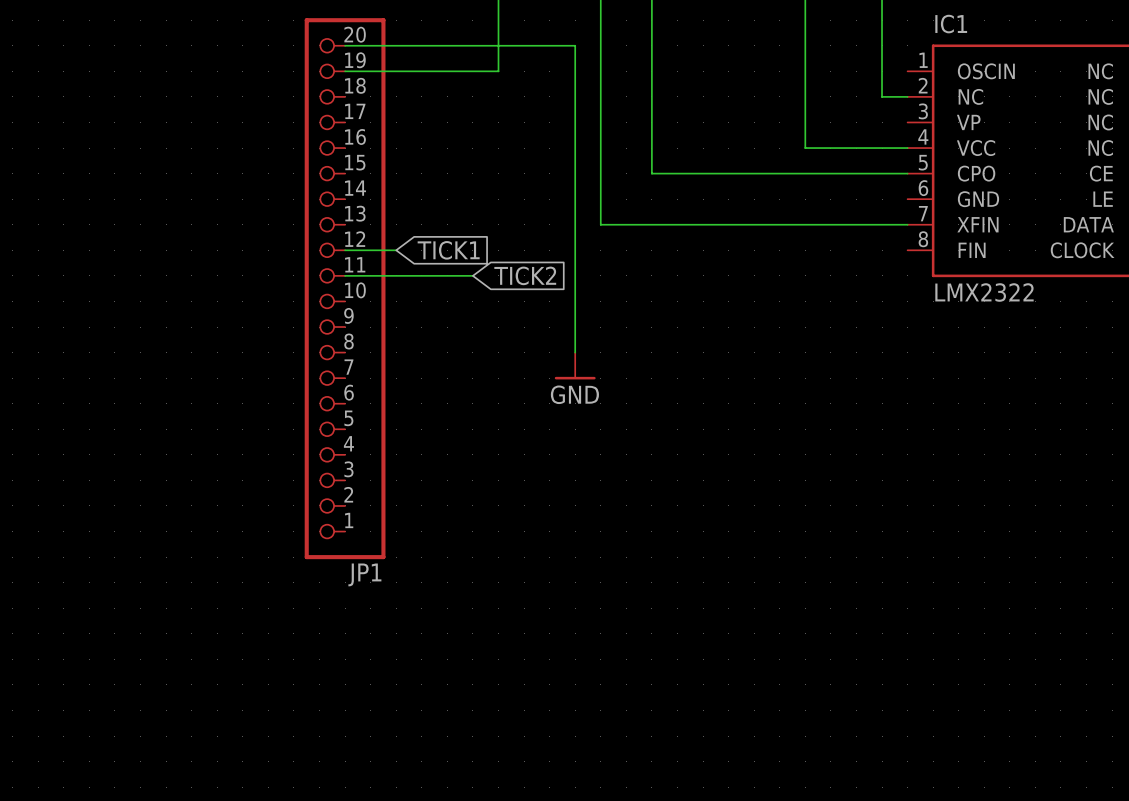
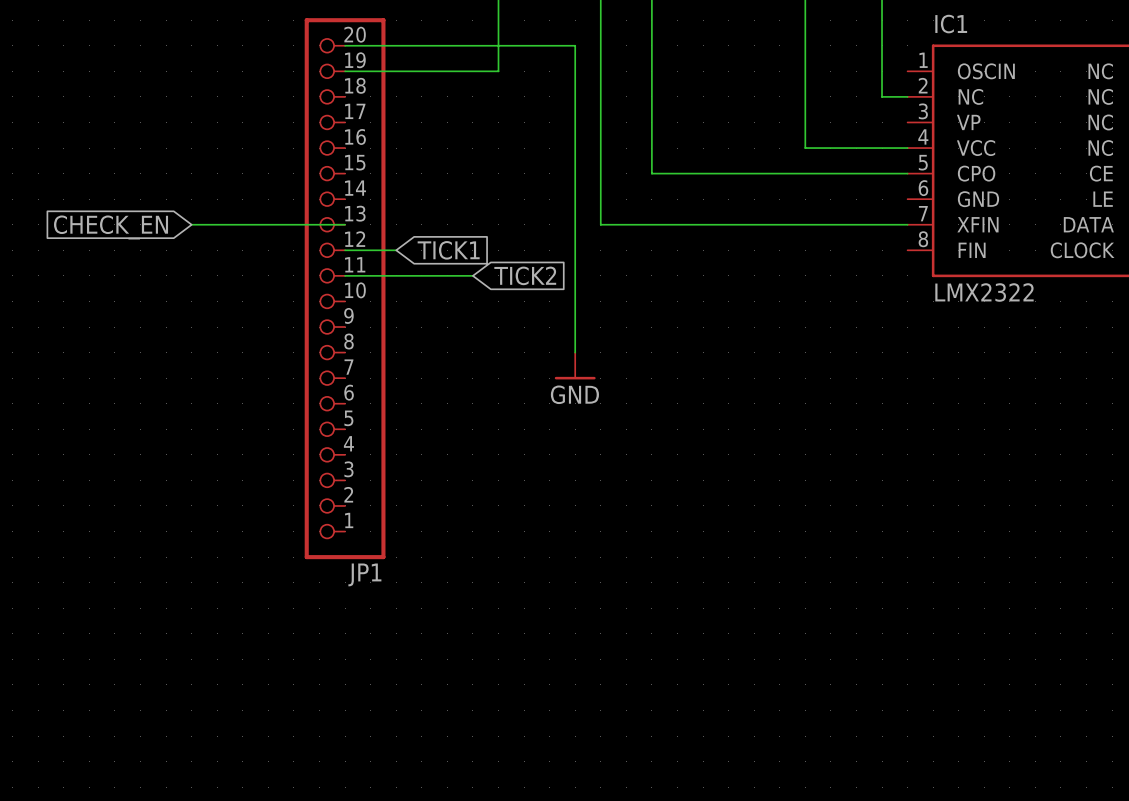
wire: none -> (191, 224) (345, 224)
global label: none -> CHECK_EN (111, 227)

